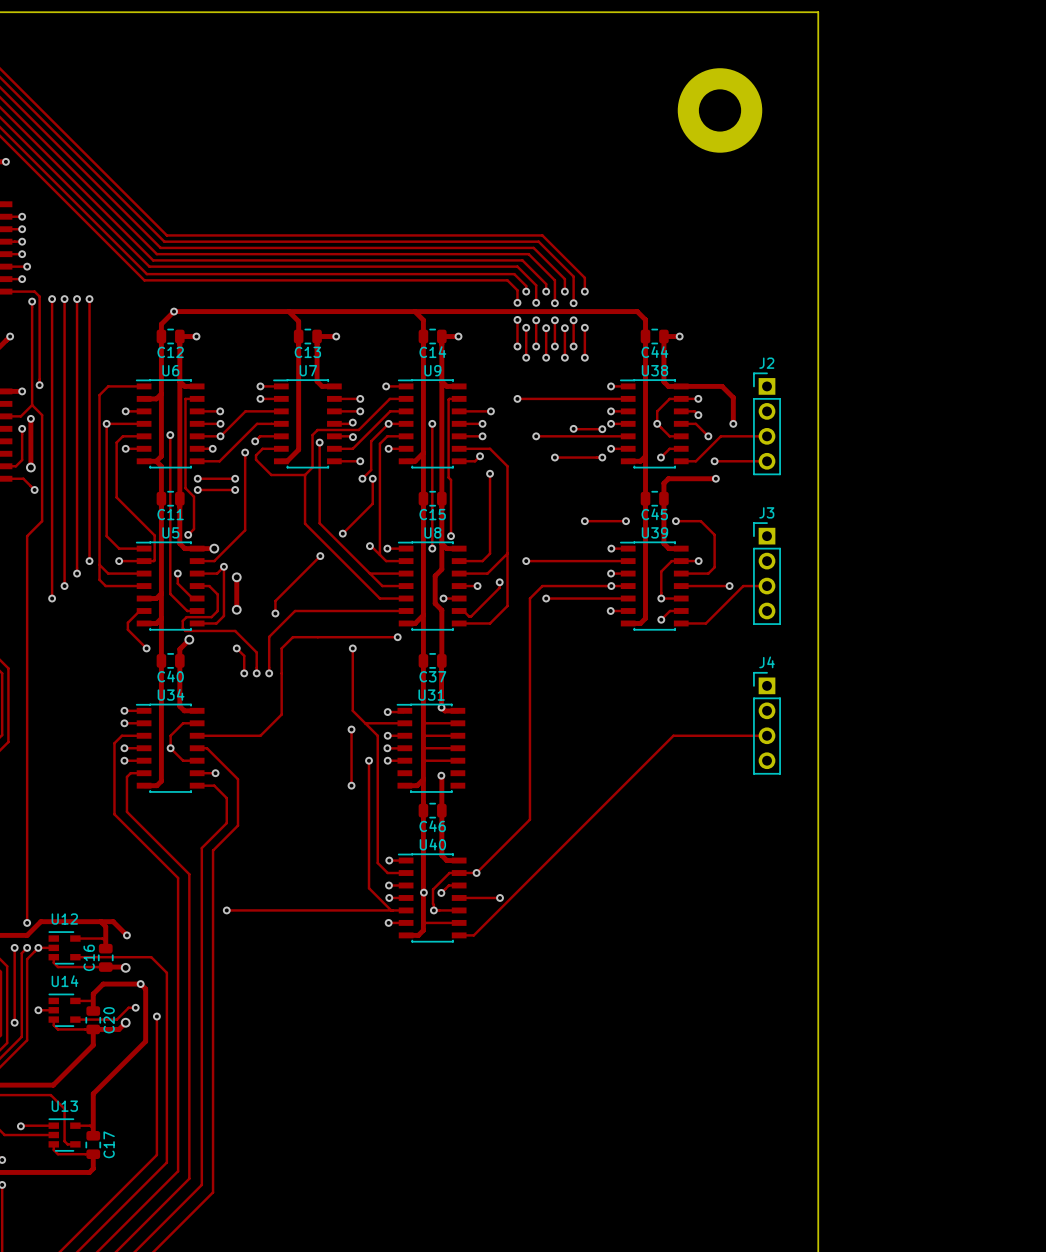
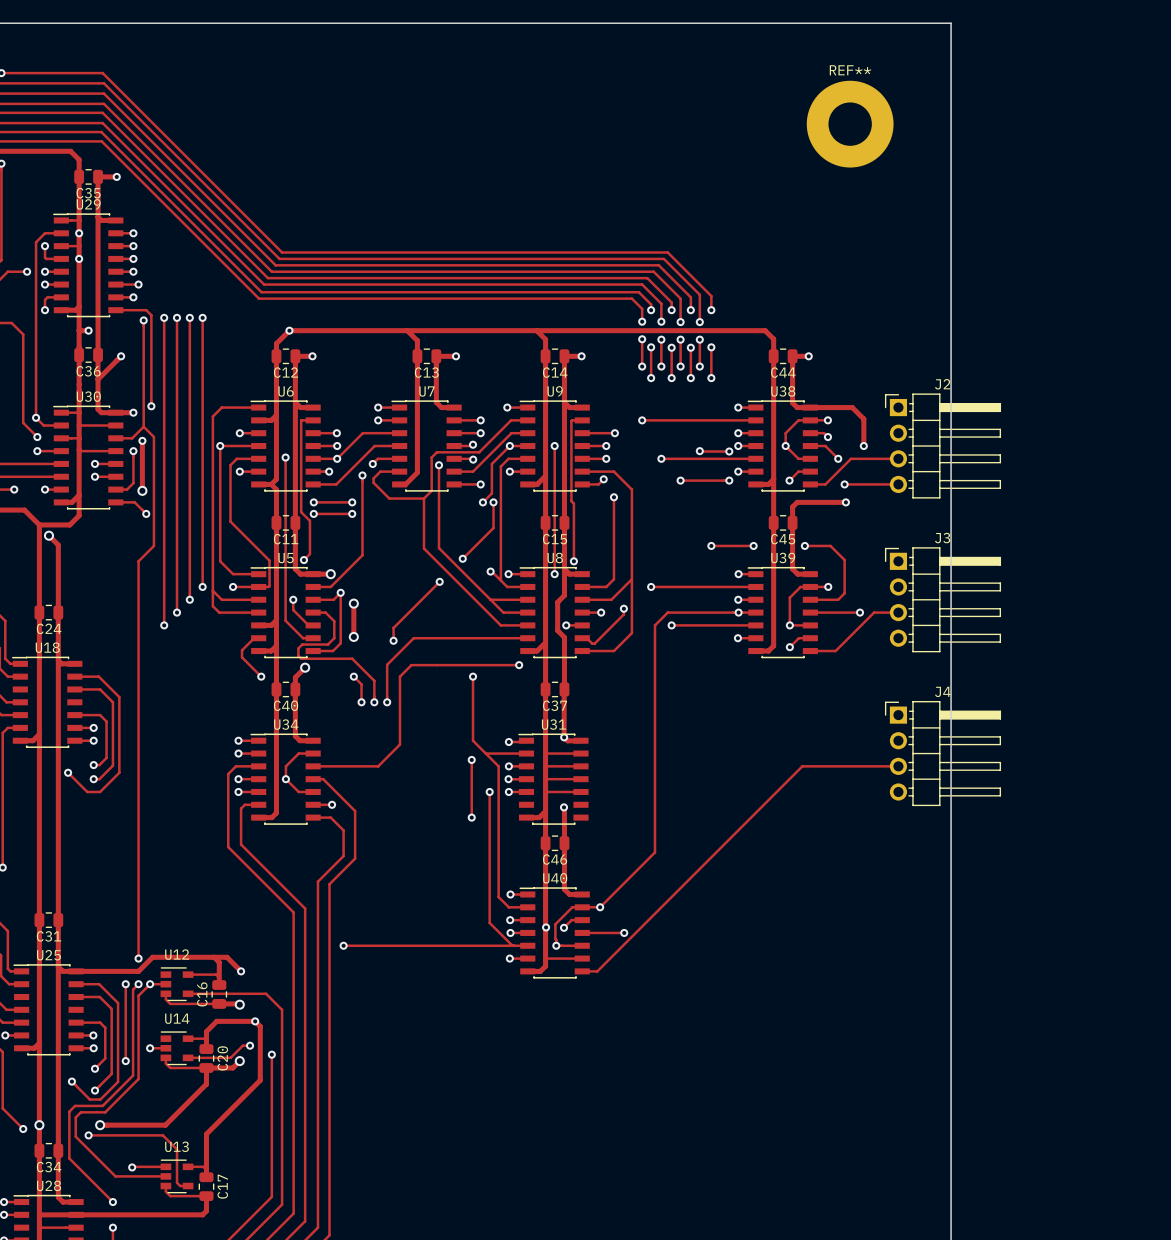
REF** name: none -> REF** (850, 70)
J2 footprint: [753, 372, 781, 475] -> [885, 393, 1001, 499]
J3 footprint: [753, 522, 781, 625] -> [885, 547, 1001, 653]
J4 footprint: [753, 672, 781, 775] -> [885, 701, 1001, 807]

